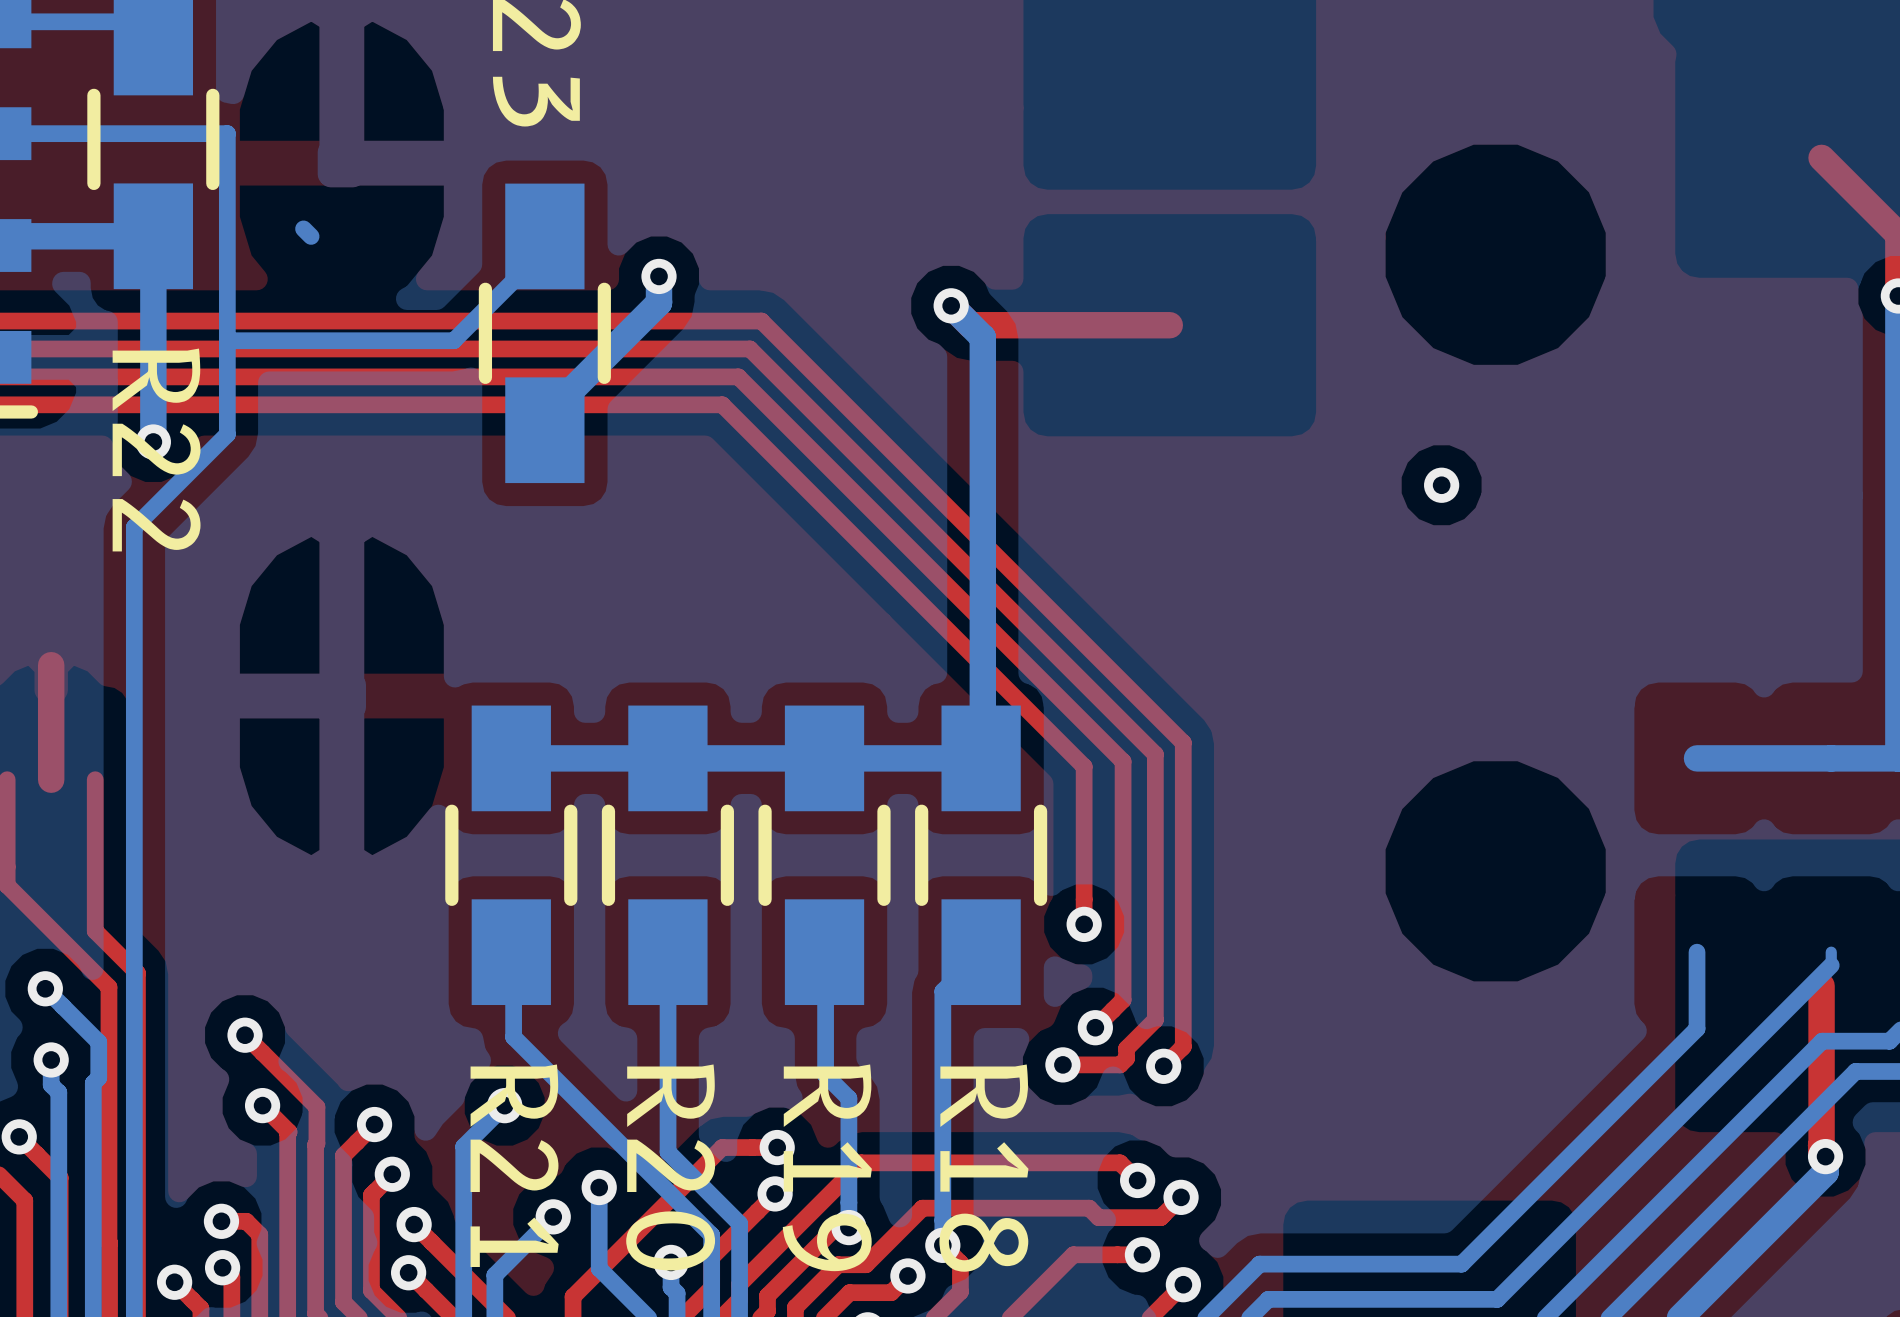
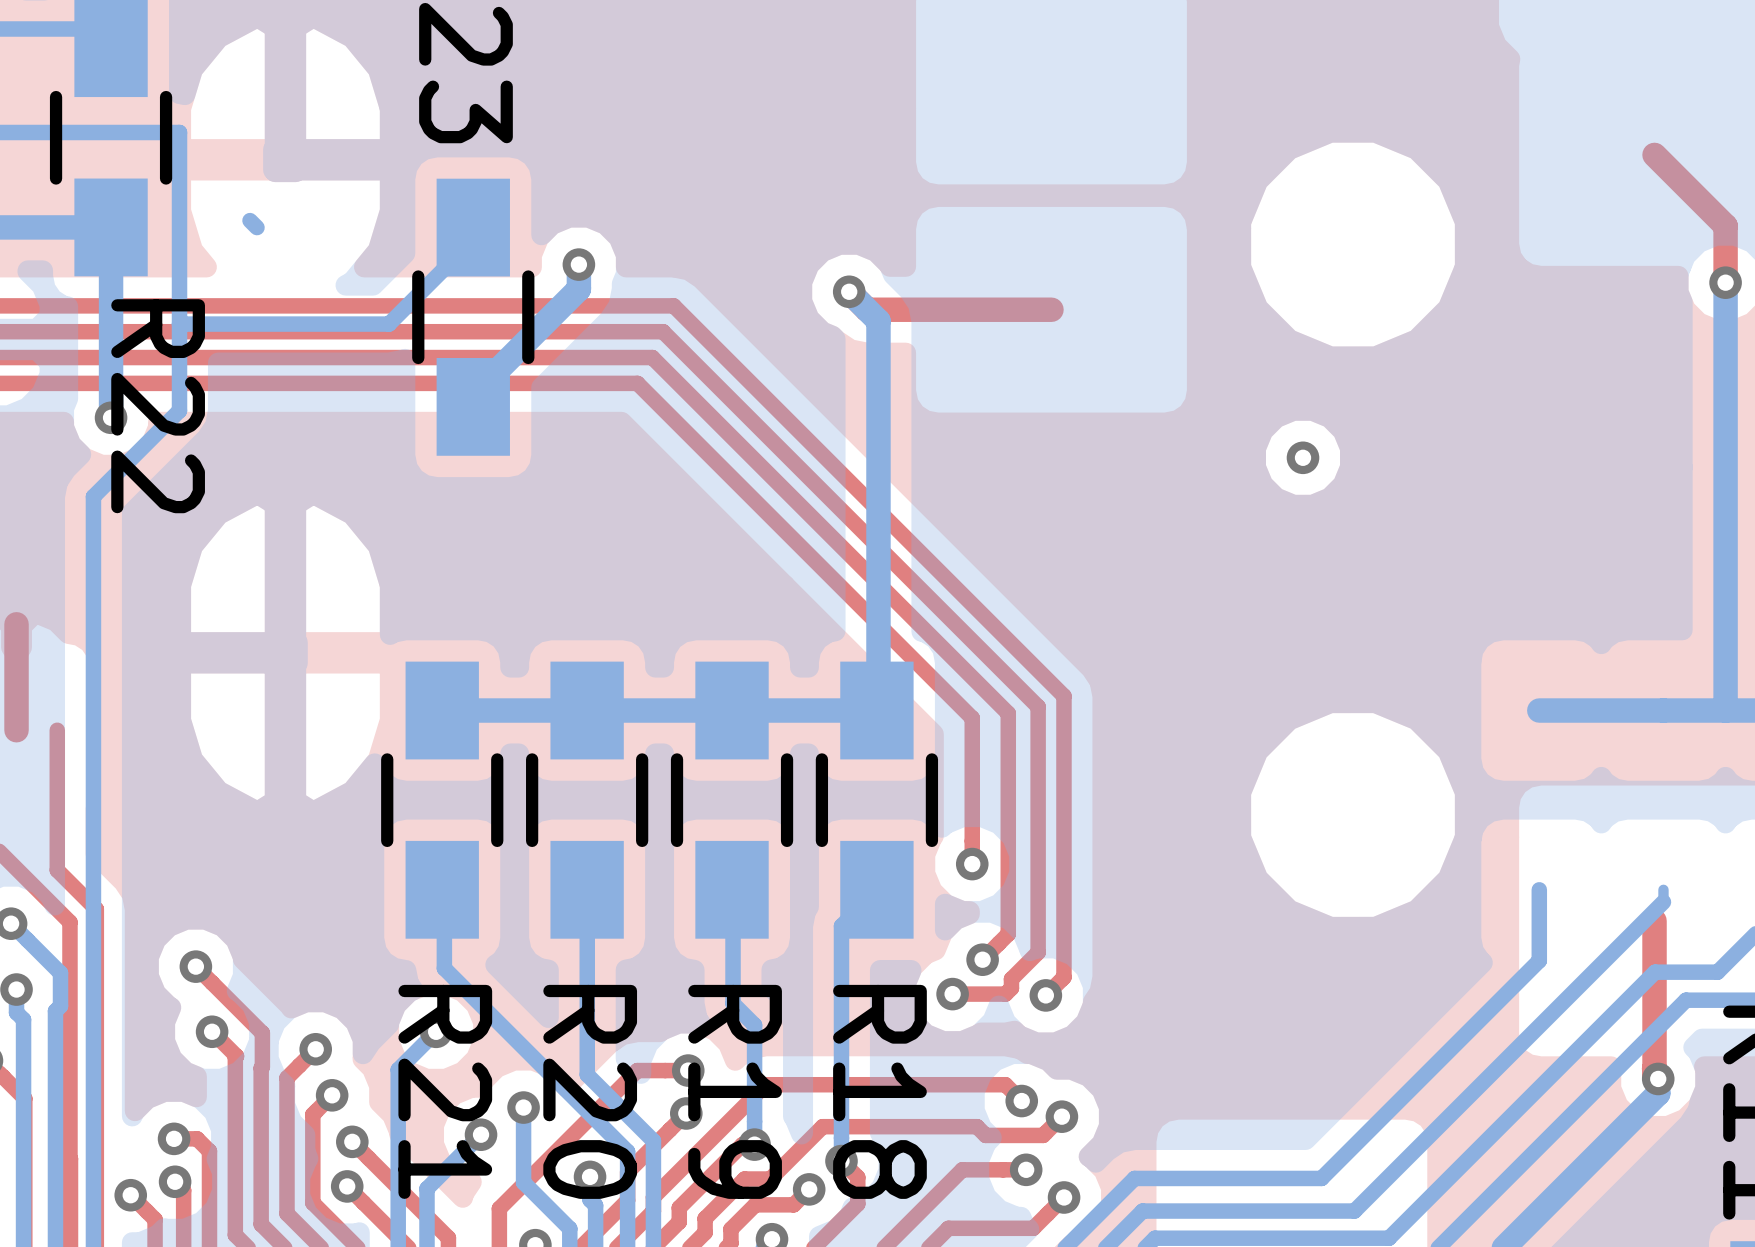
R22 name position: R22 (156, 450) -> R22 (158, 406)

